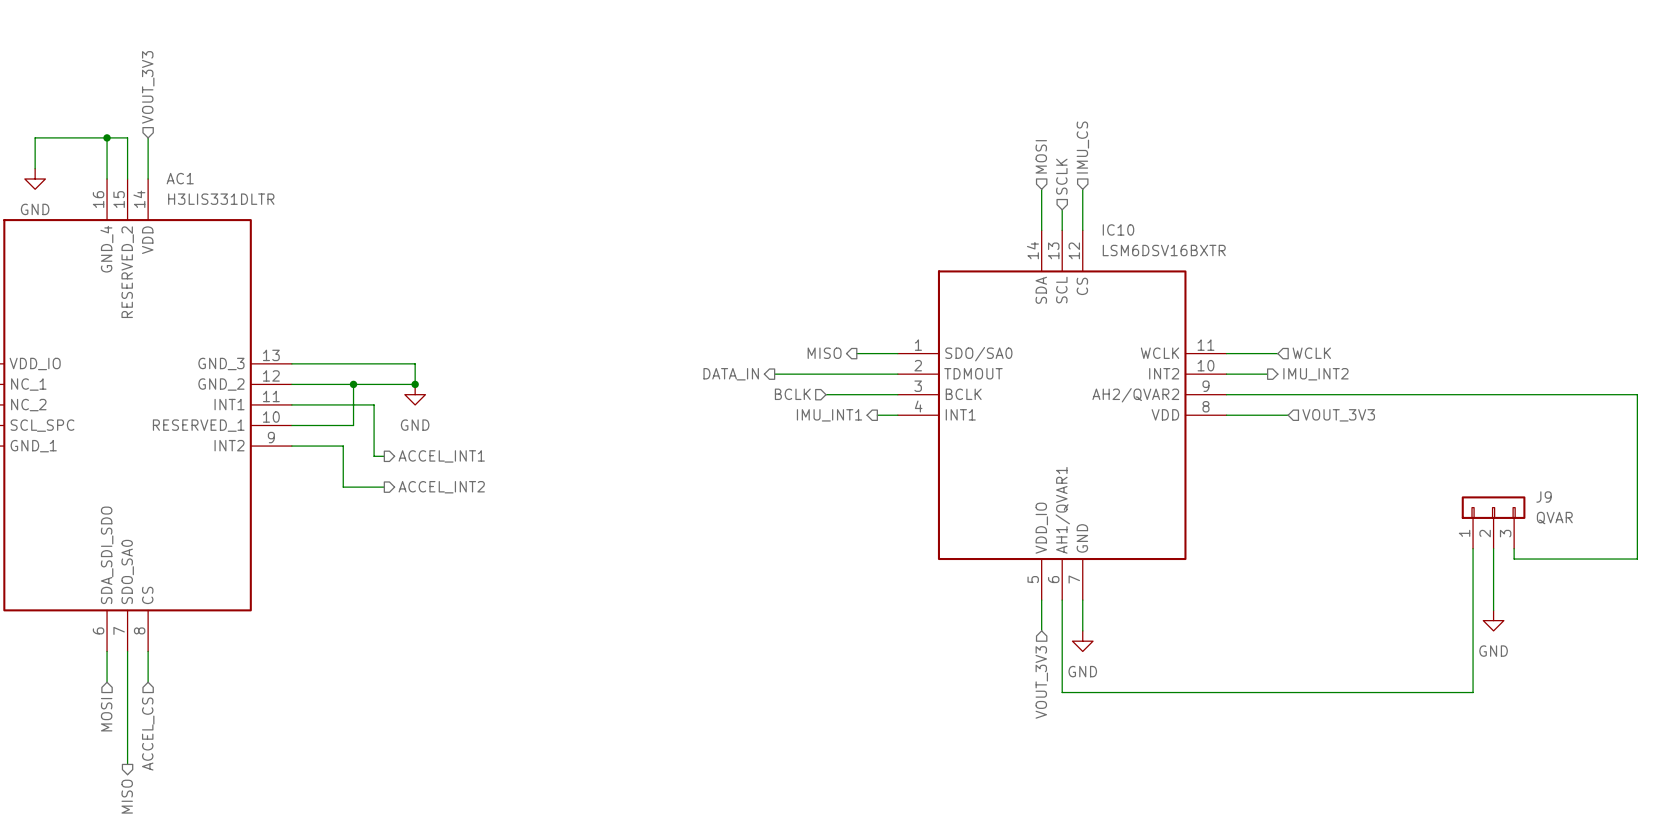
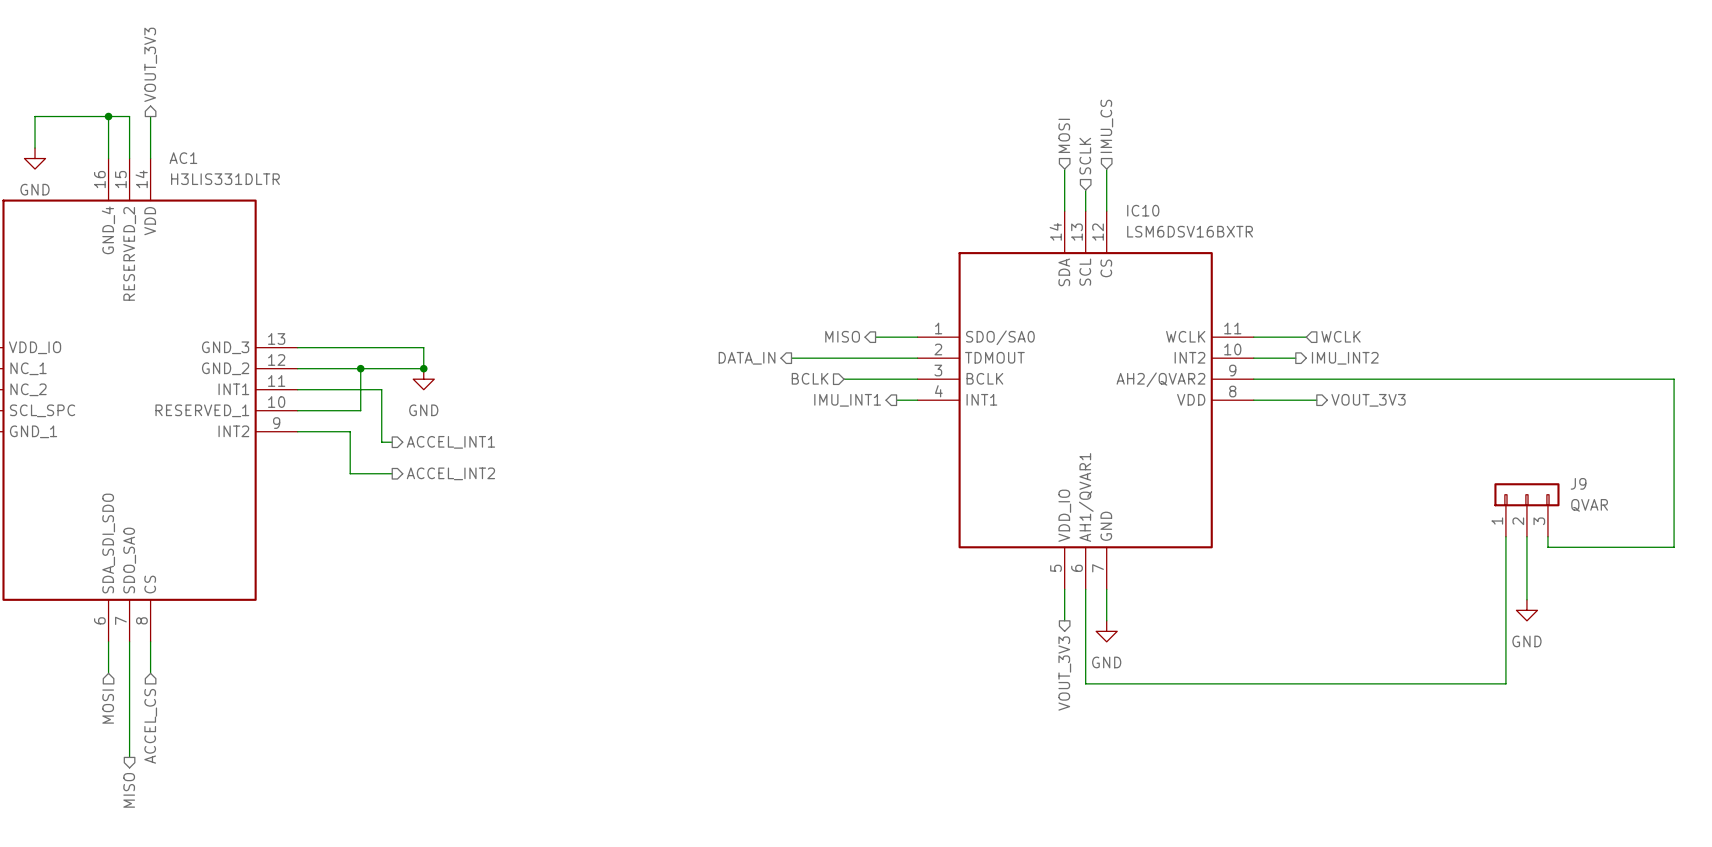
hierarchical label shape: input (148, 87) -> output (150, 64)
hierarchical label shape: input (1338, 415) -> output (1368, 400)
hierarchical label shape: input (1041, 682) -> output (1064, 673)

